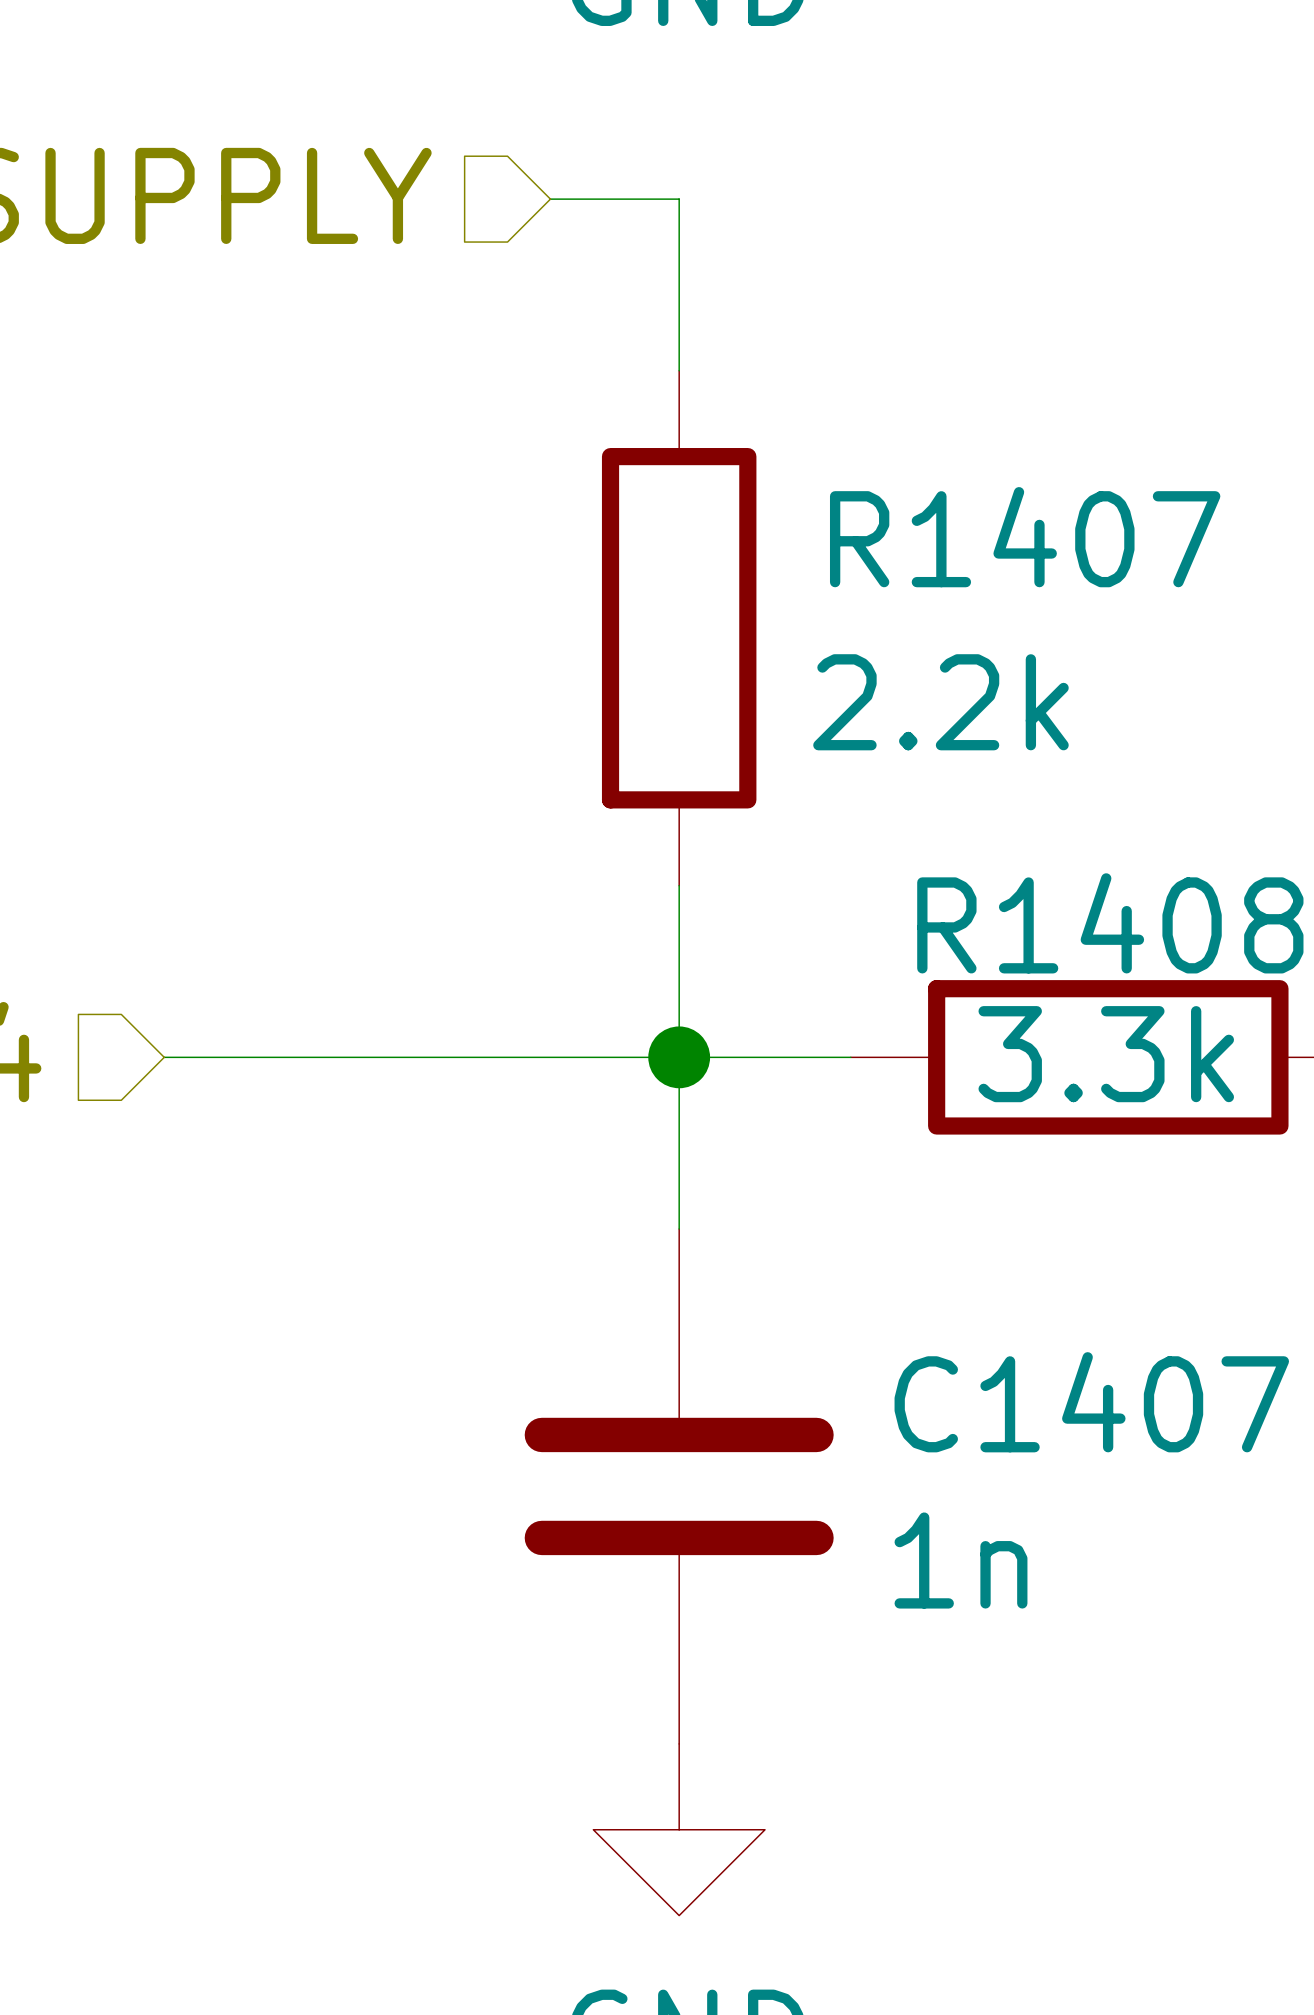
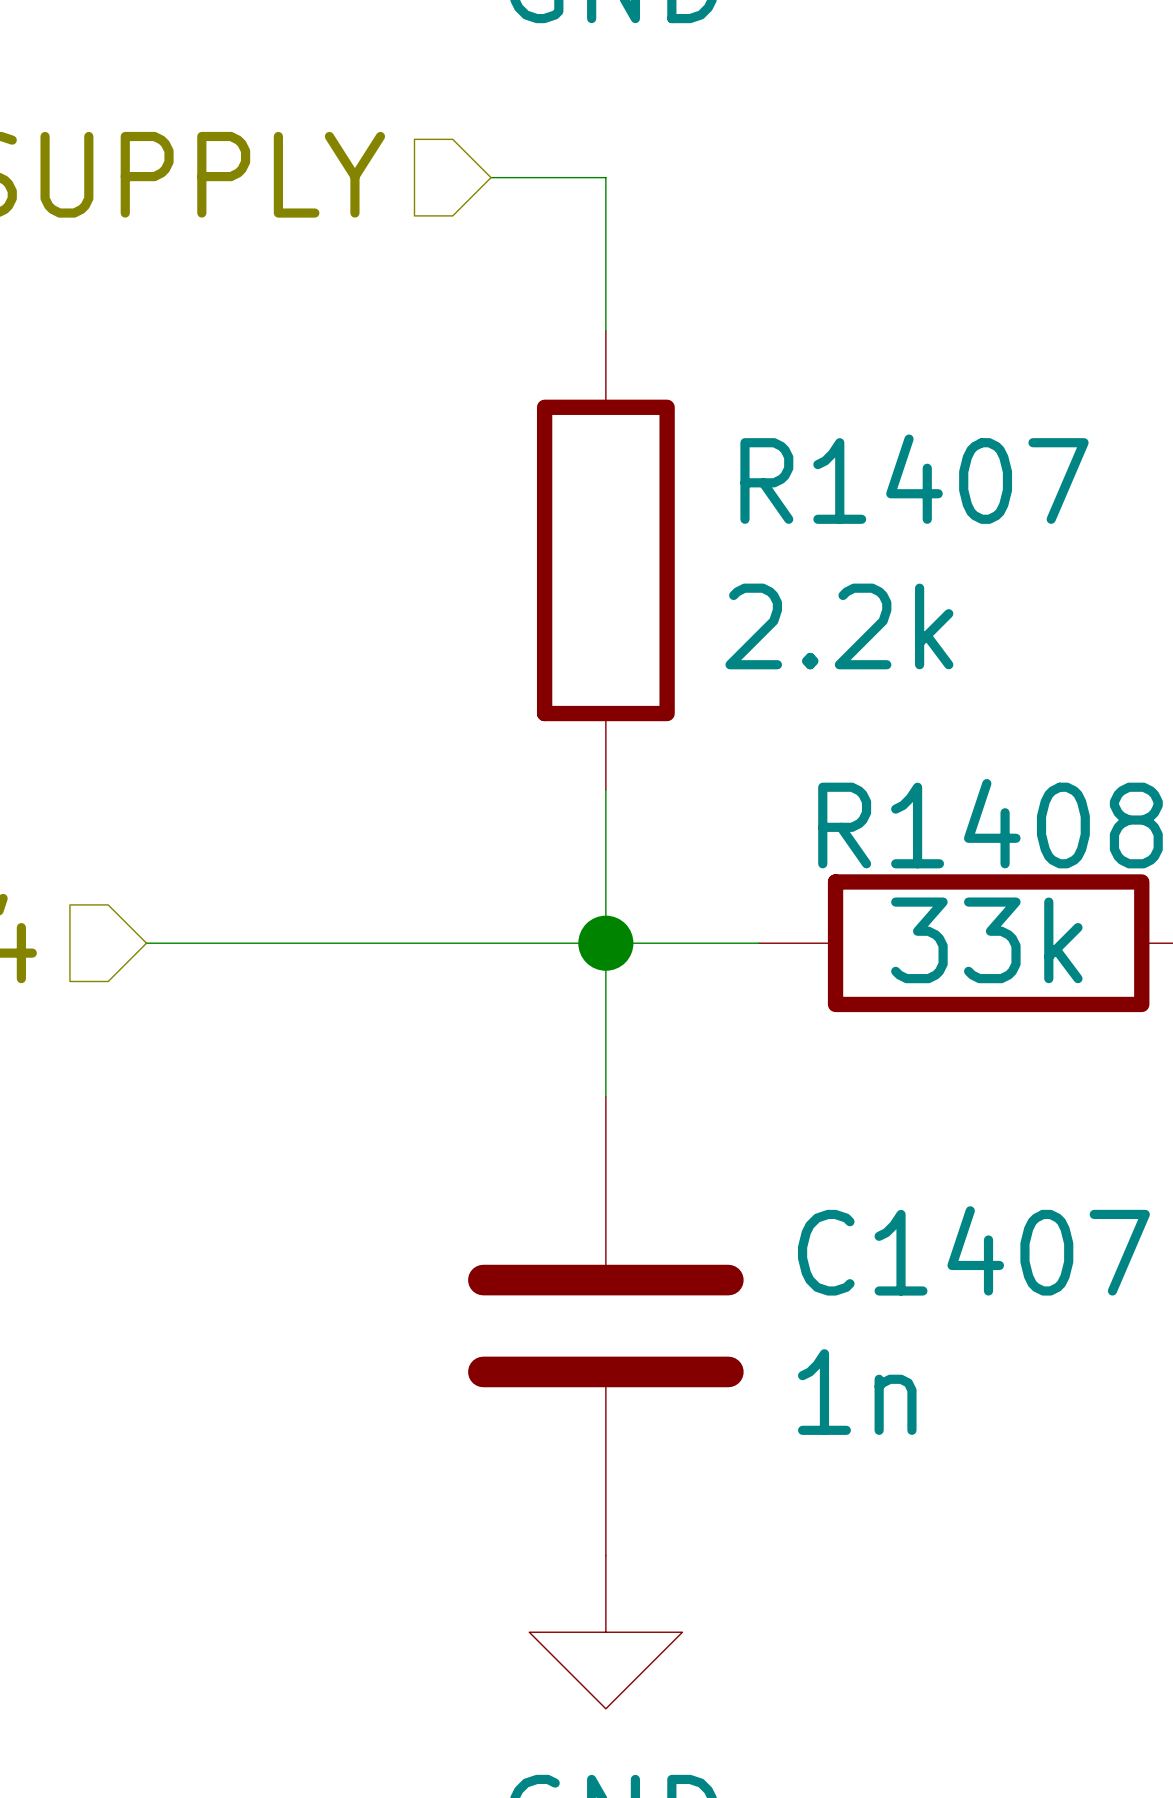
R1408 value: 3.3k (1106, 1054) -> 33k (986, 940)

